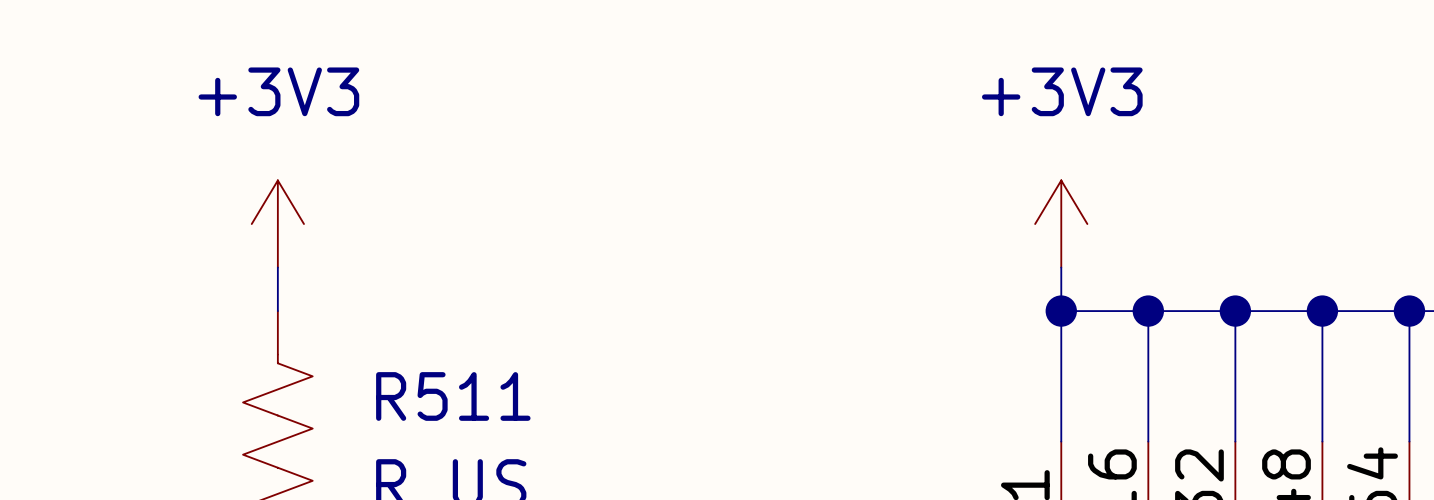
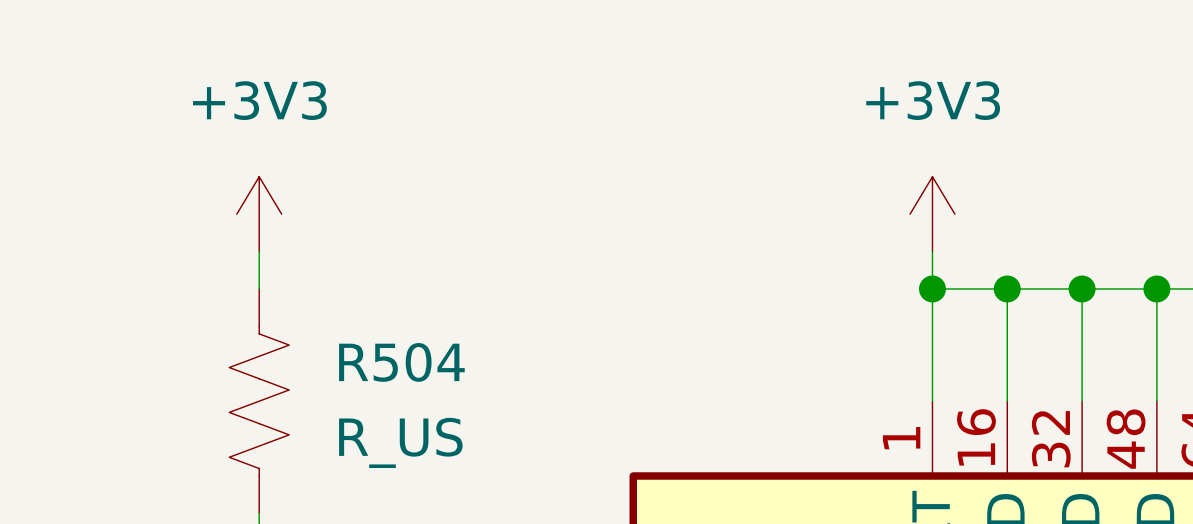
R511 name: R511 (453, 396) -> R504 (401, 362)

